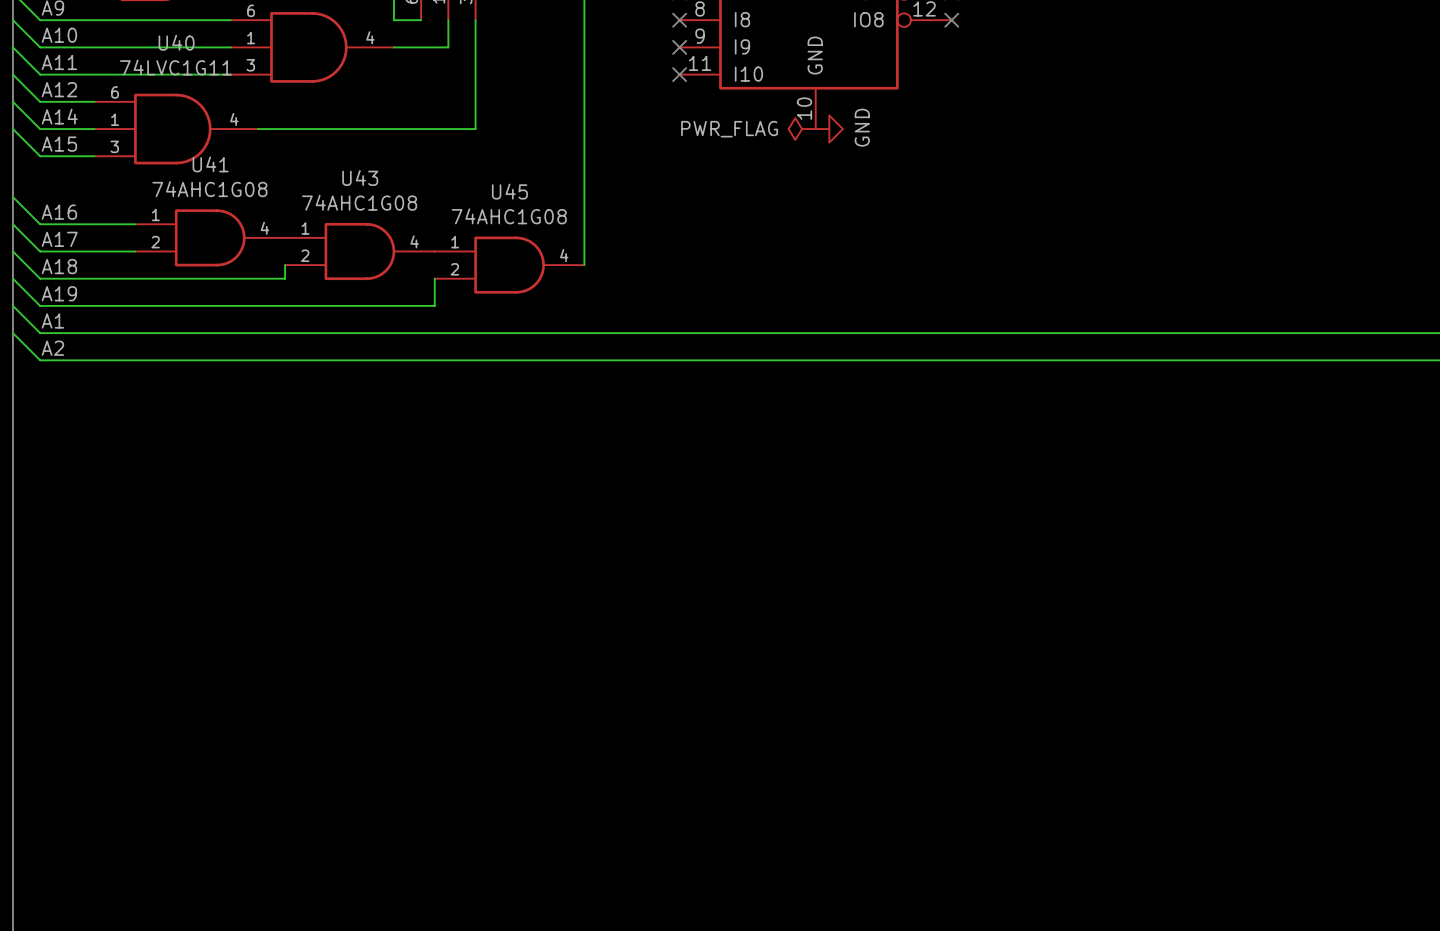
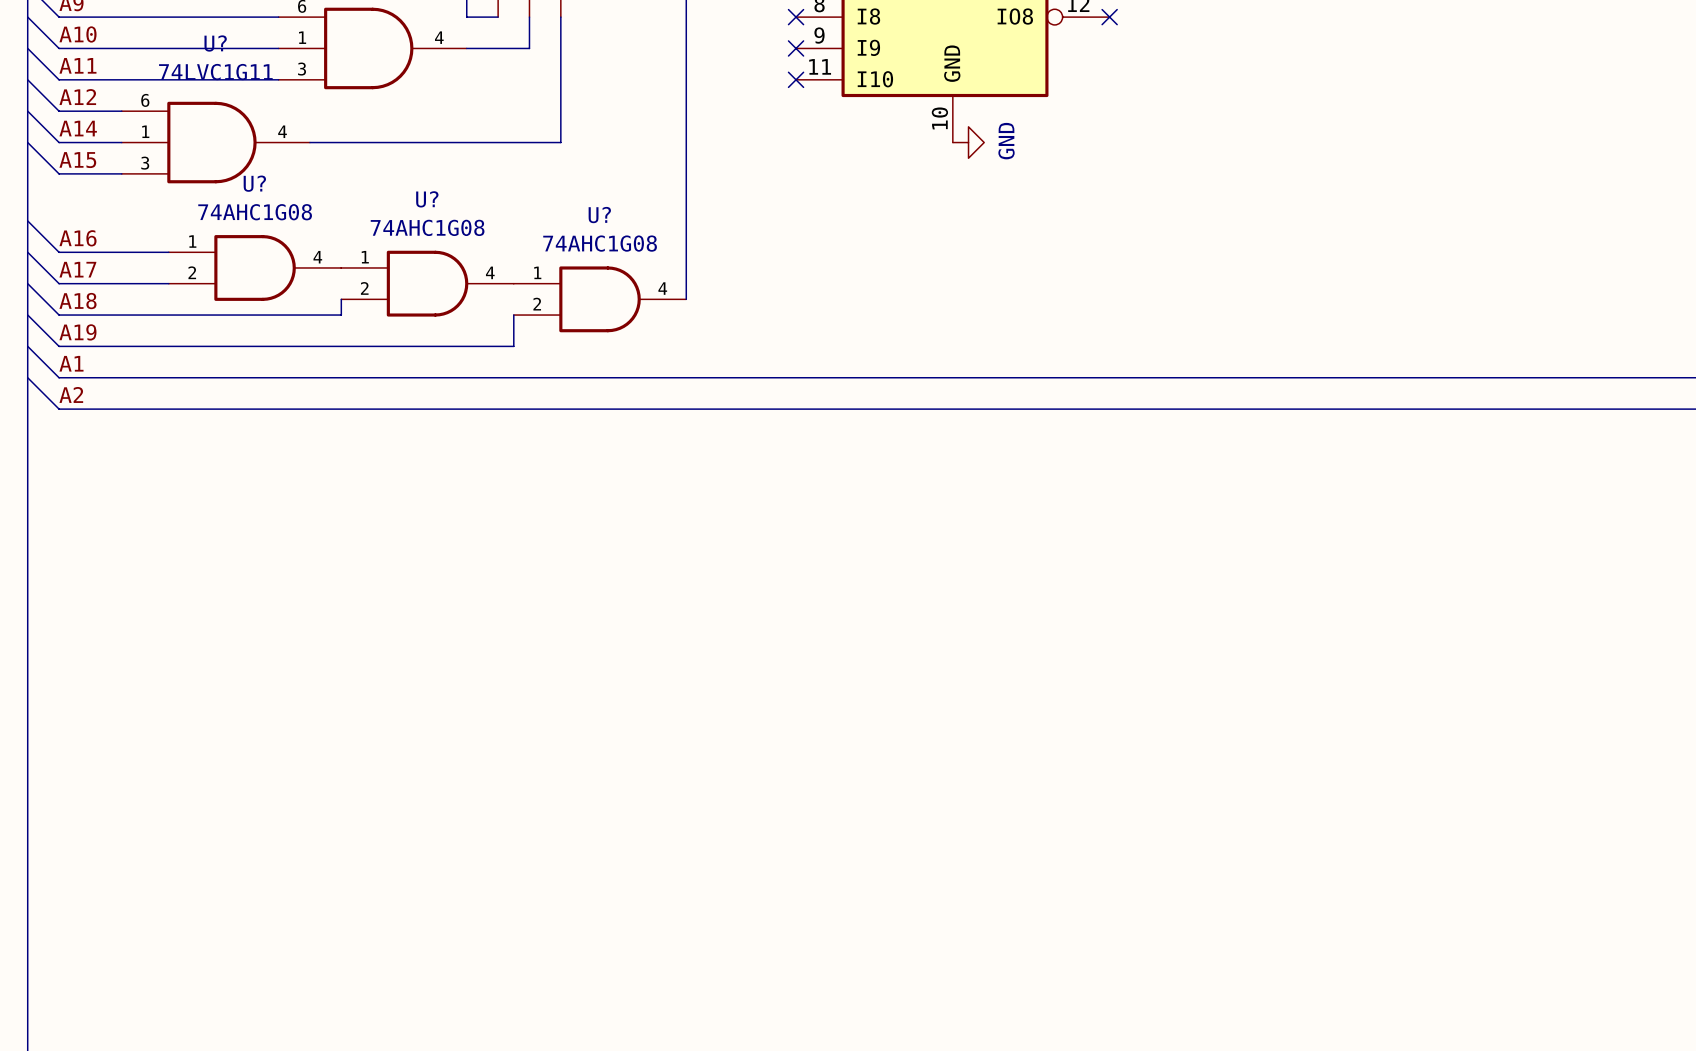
U40 name: U40 (176, 42) -> U? (215, 43)
power symbol: PWR_FLAG (802, 129) -> none
U41 name: U41 (210, 164) -> U? (254, 183)
U43 name: U43 (360, 178) -> U? (427, 199)
U45 name: U45 (509, 191) -> U? (599, 215)

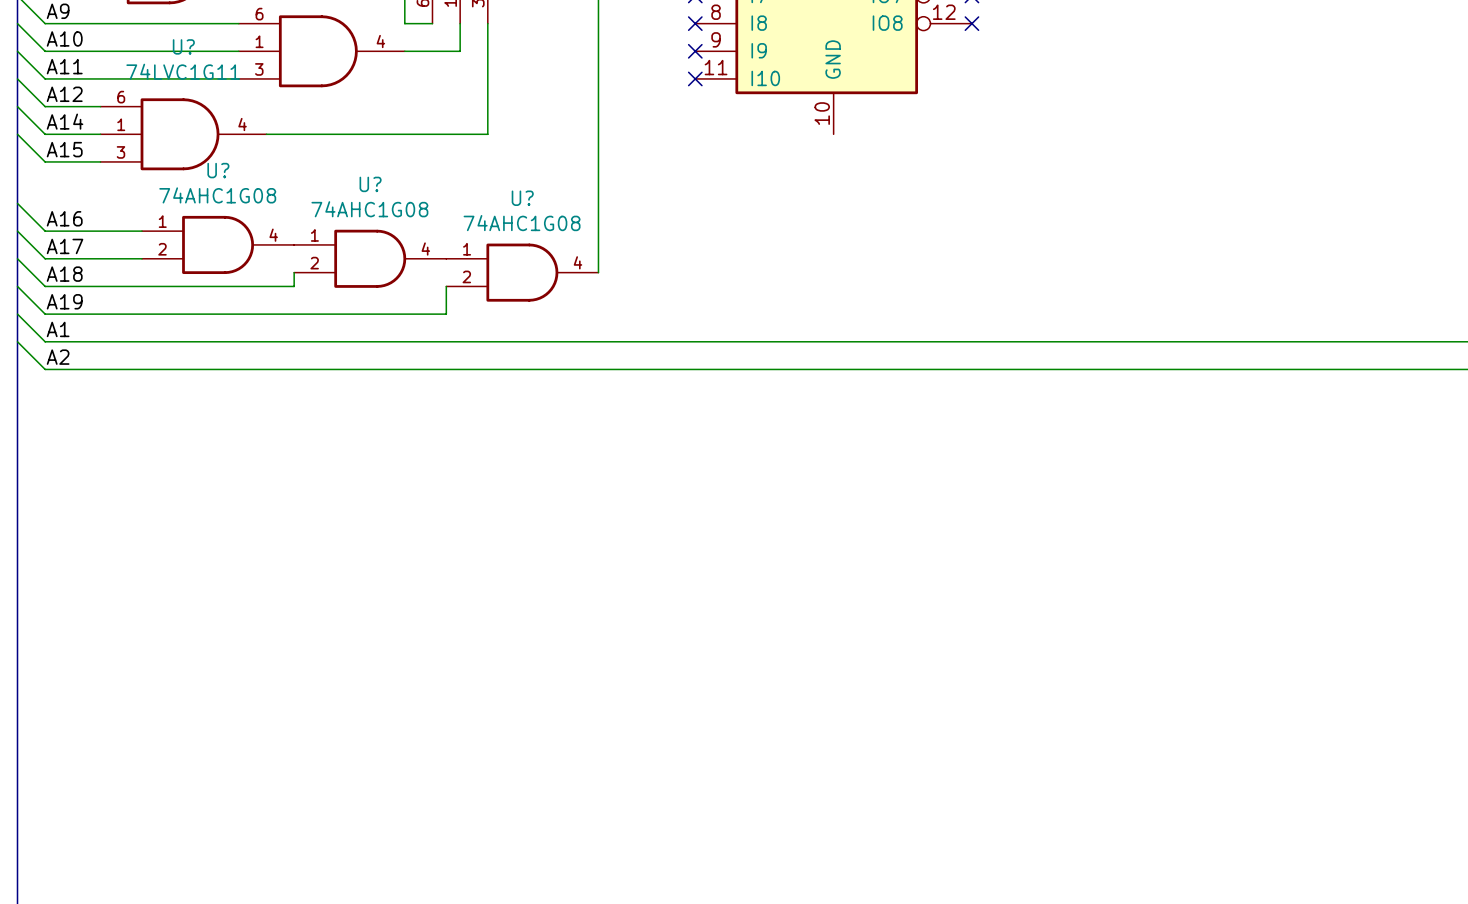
power symbol: GND (968, 142) -> none

